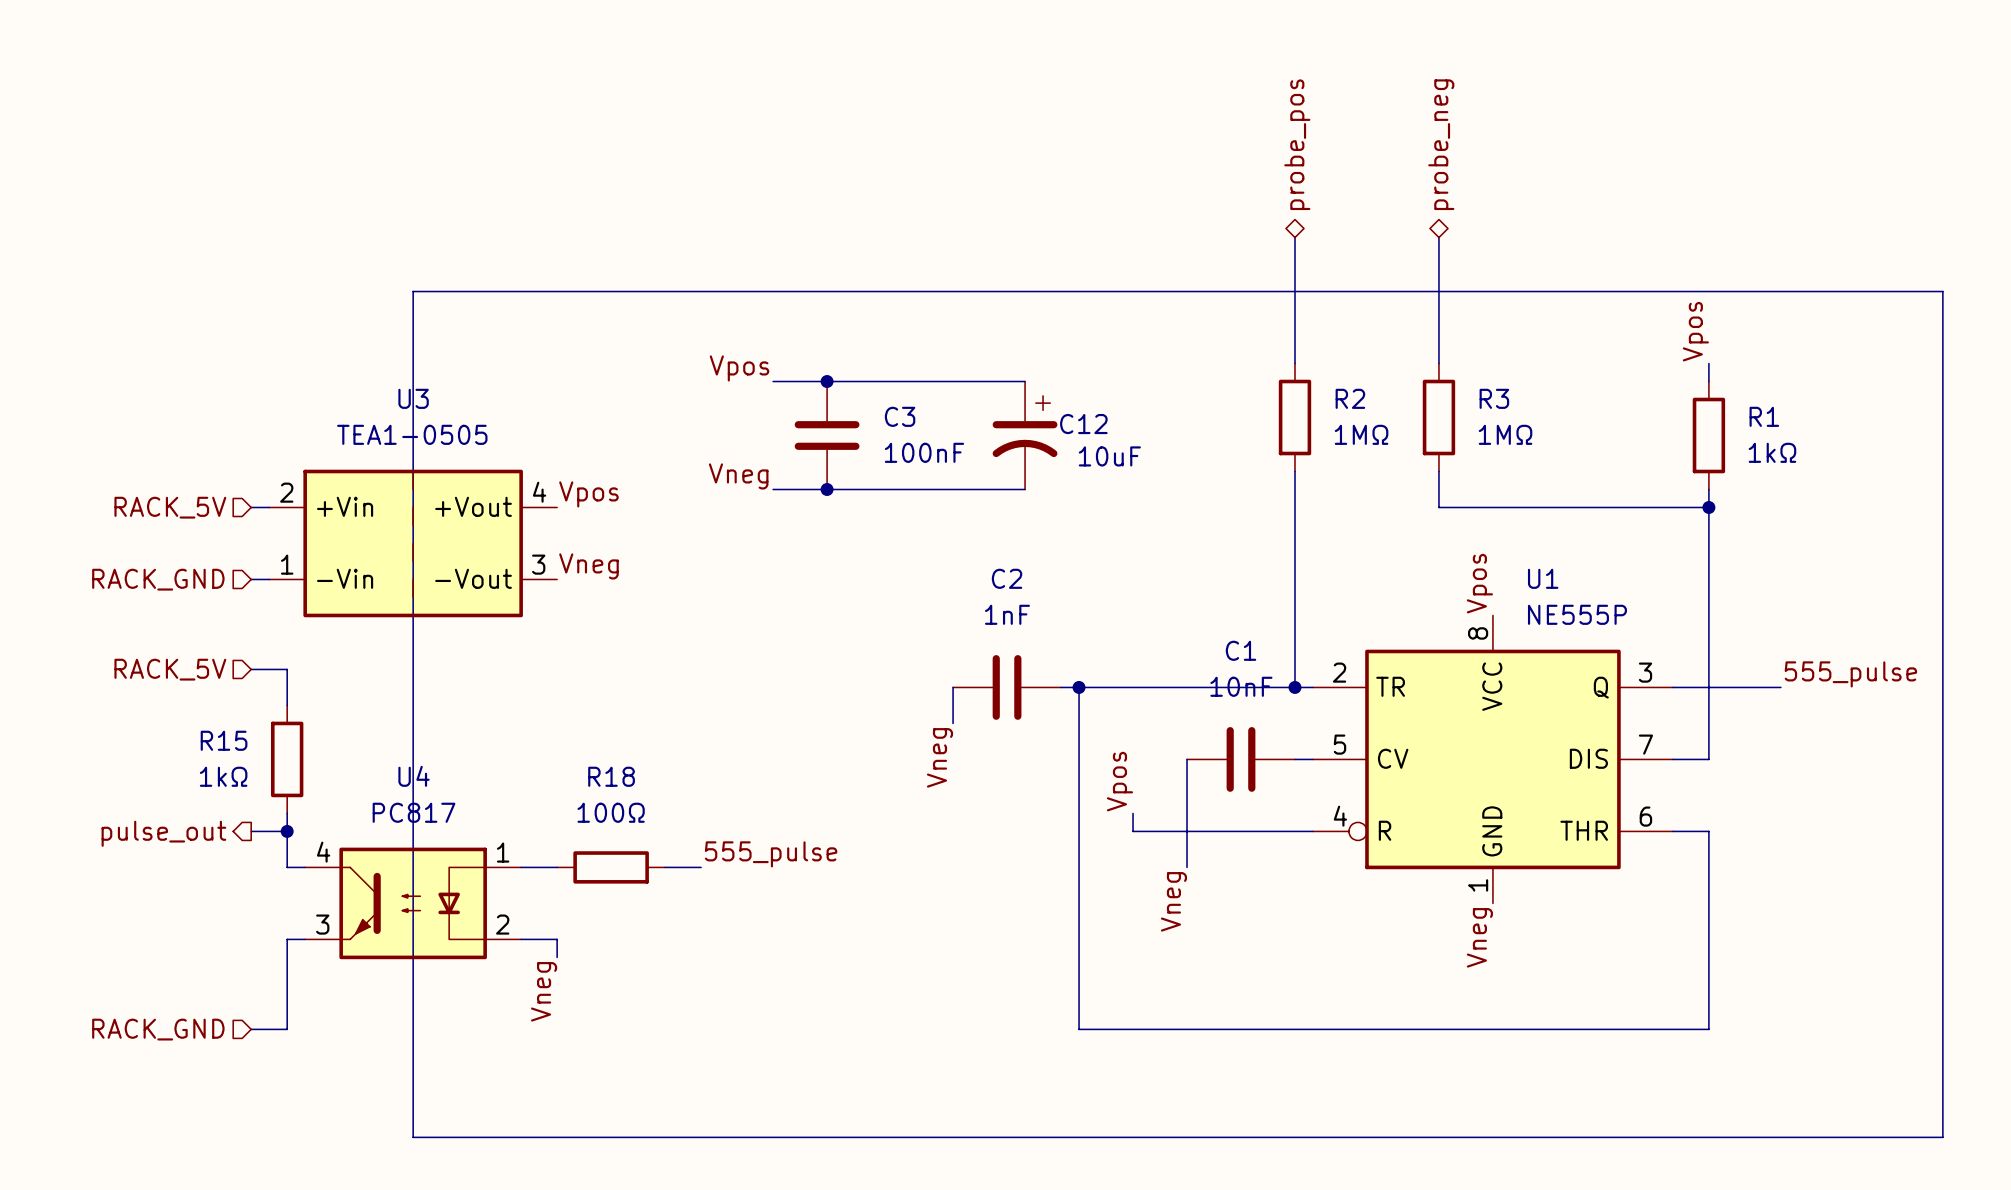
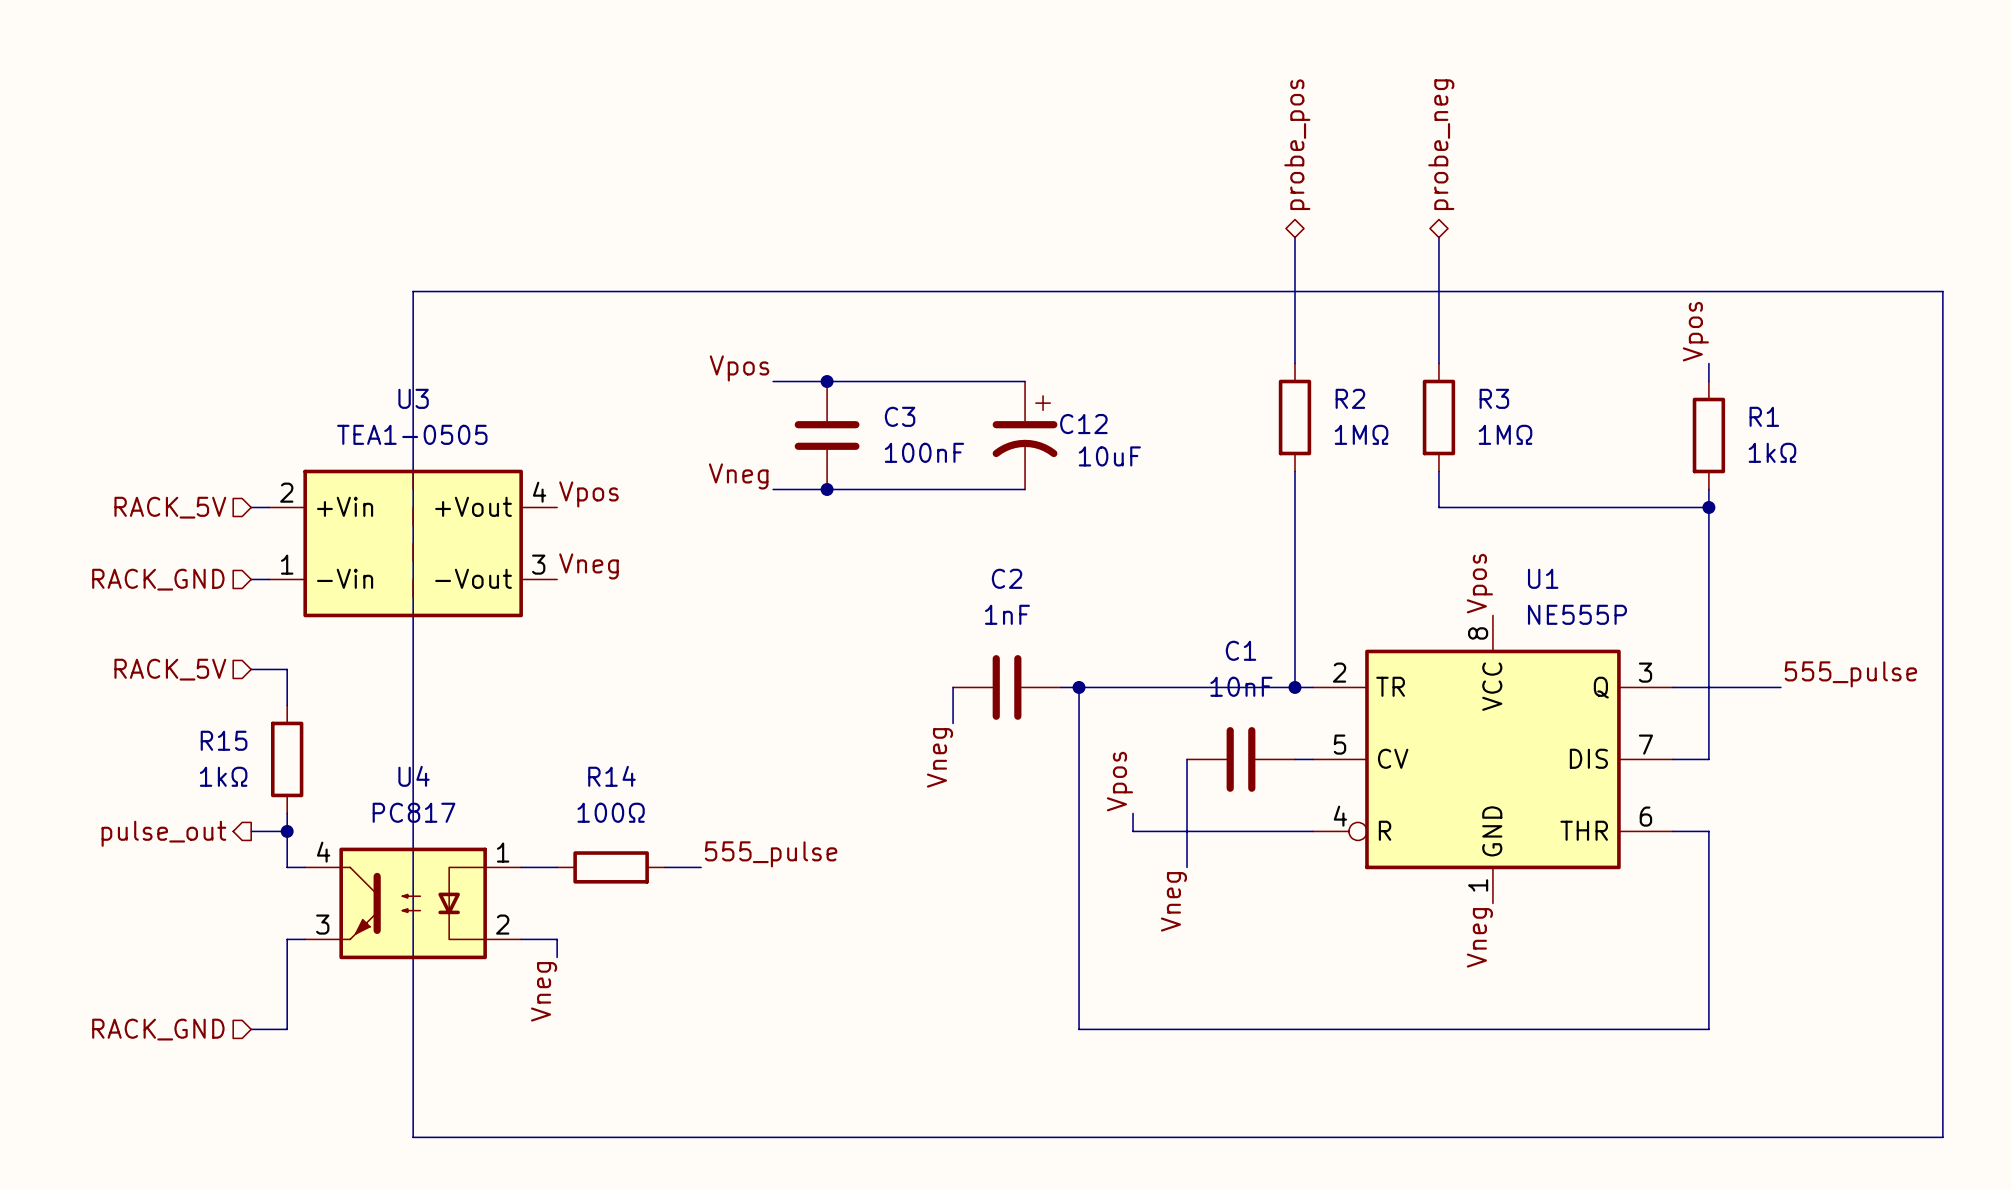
R18 name: R18 (611, 776) -> R14 (611, 776)

